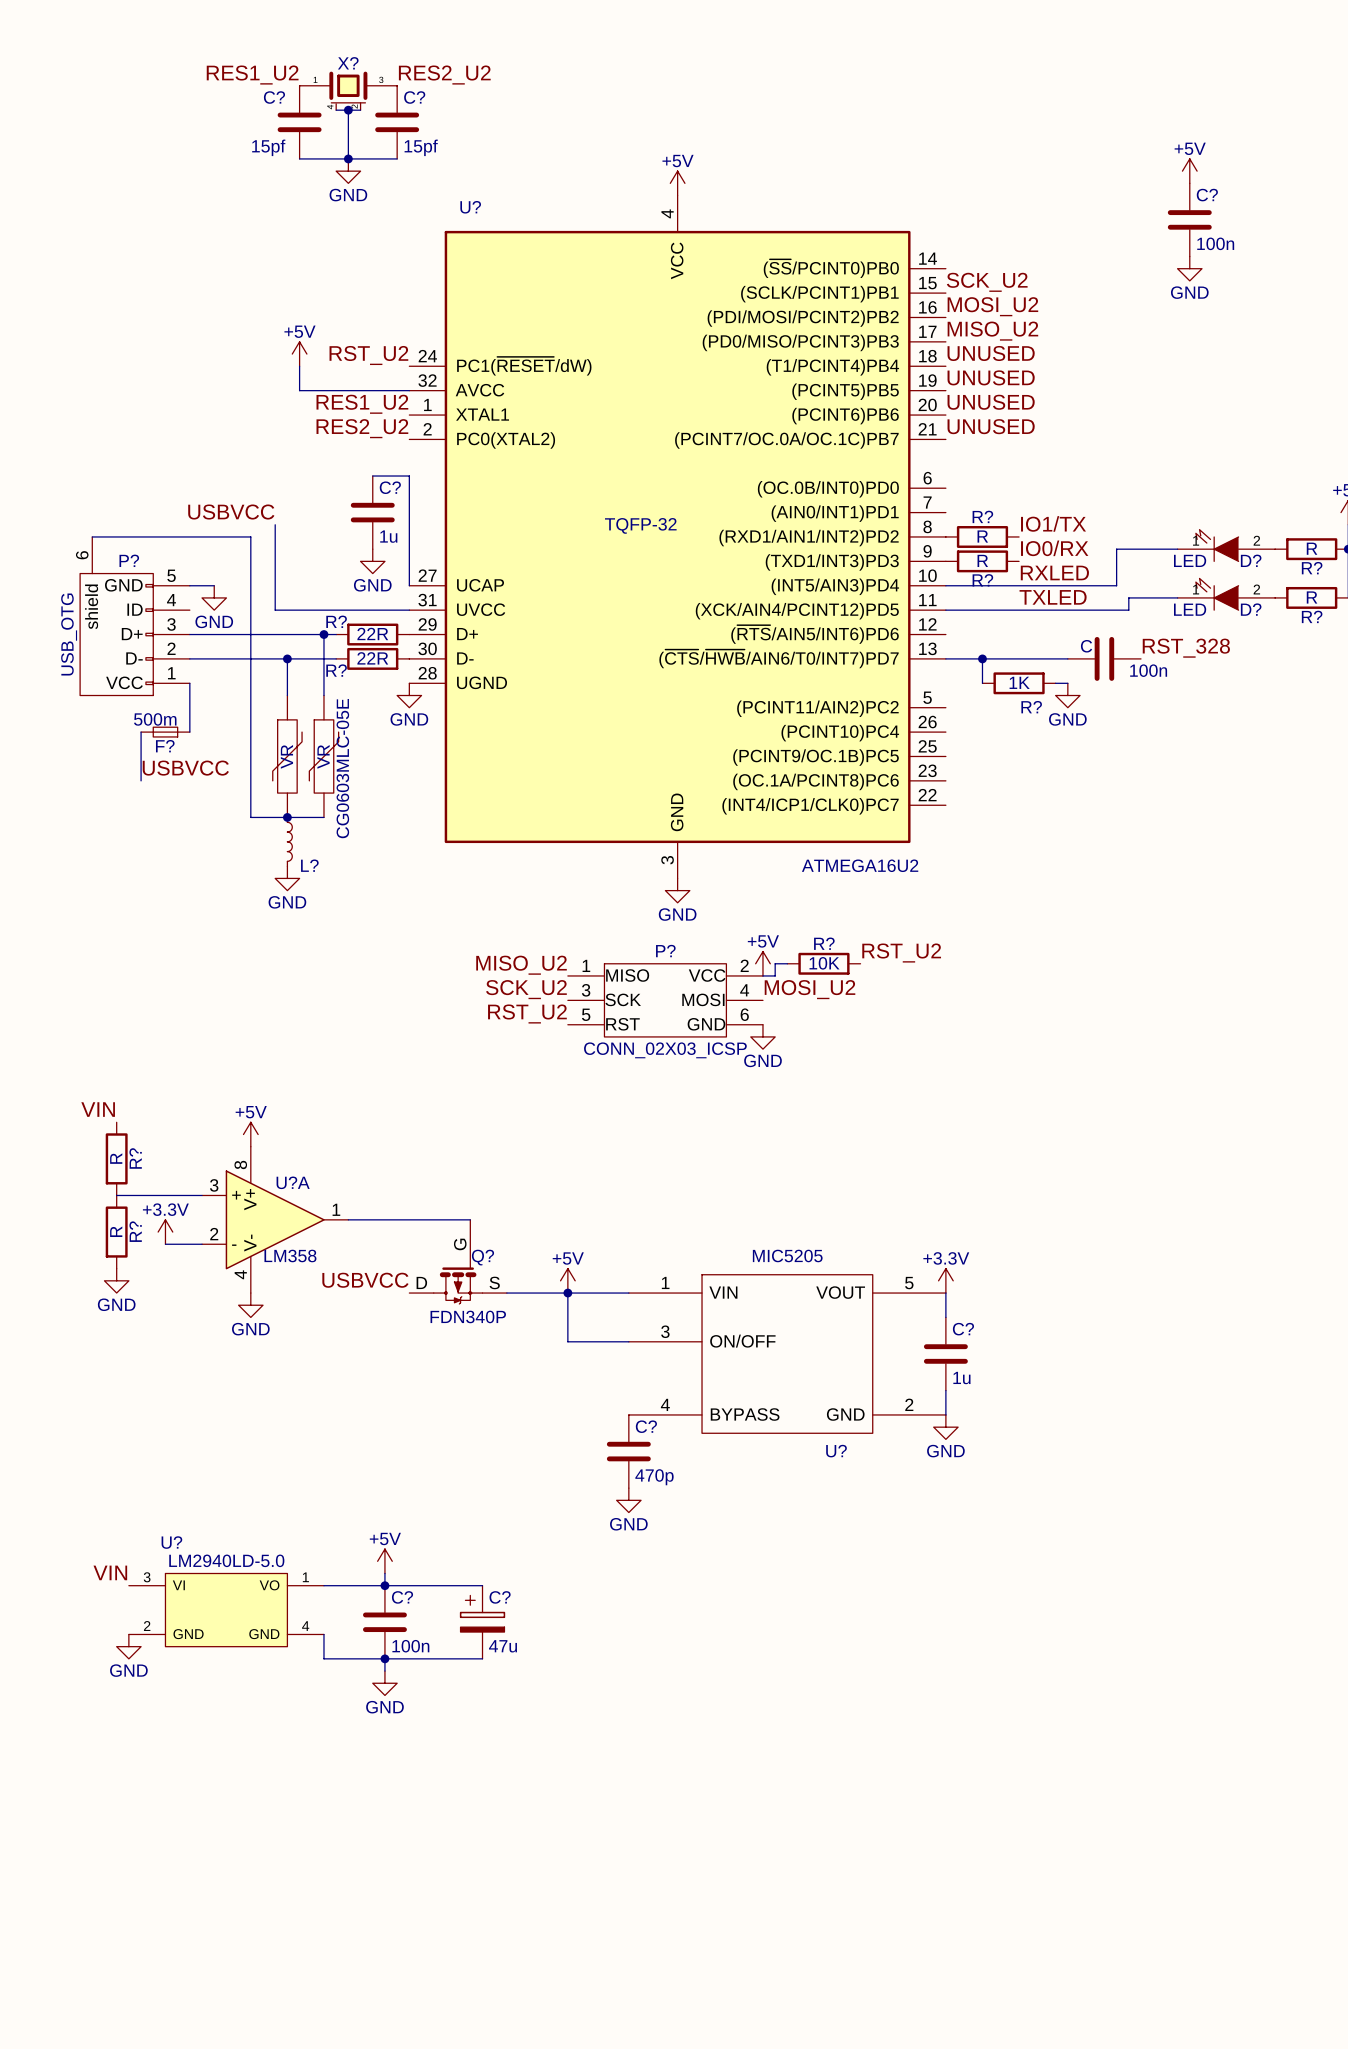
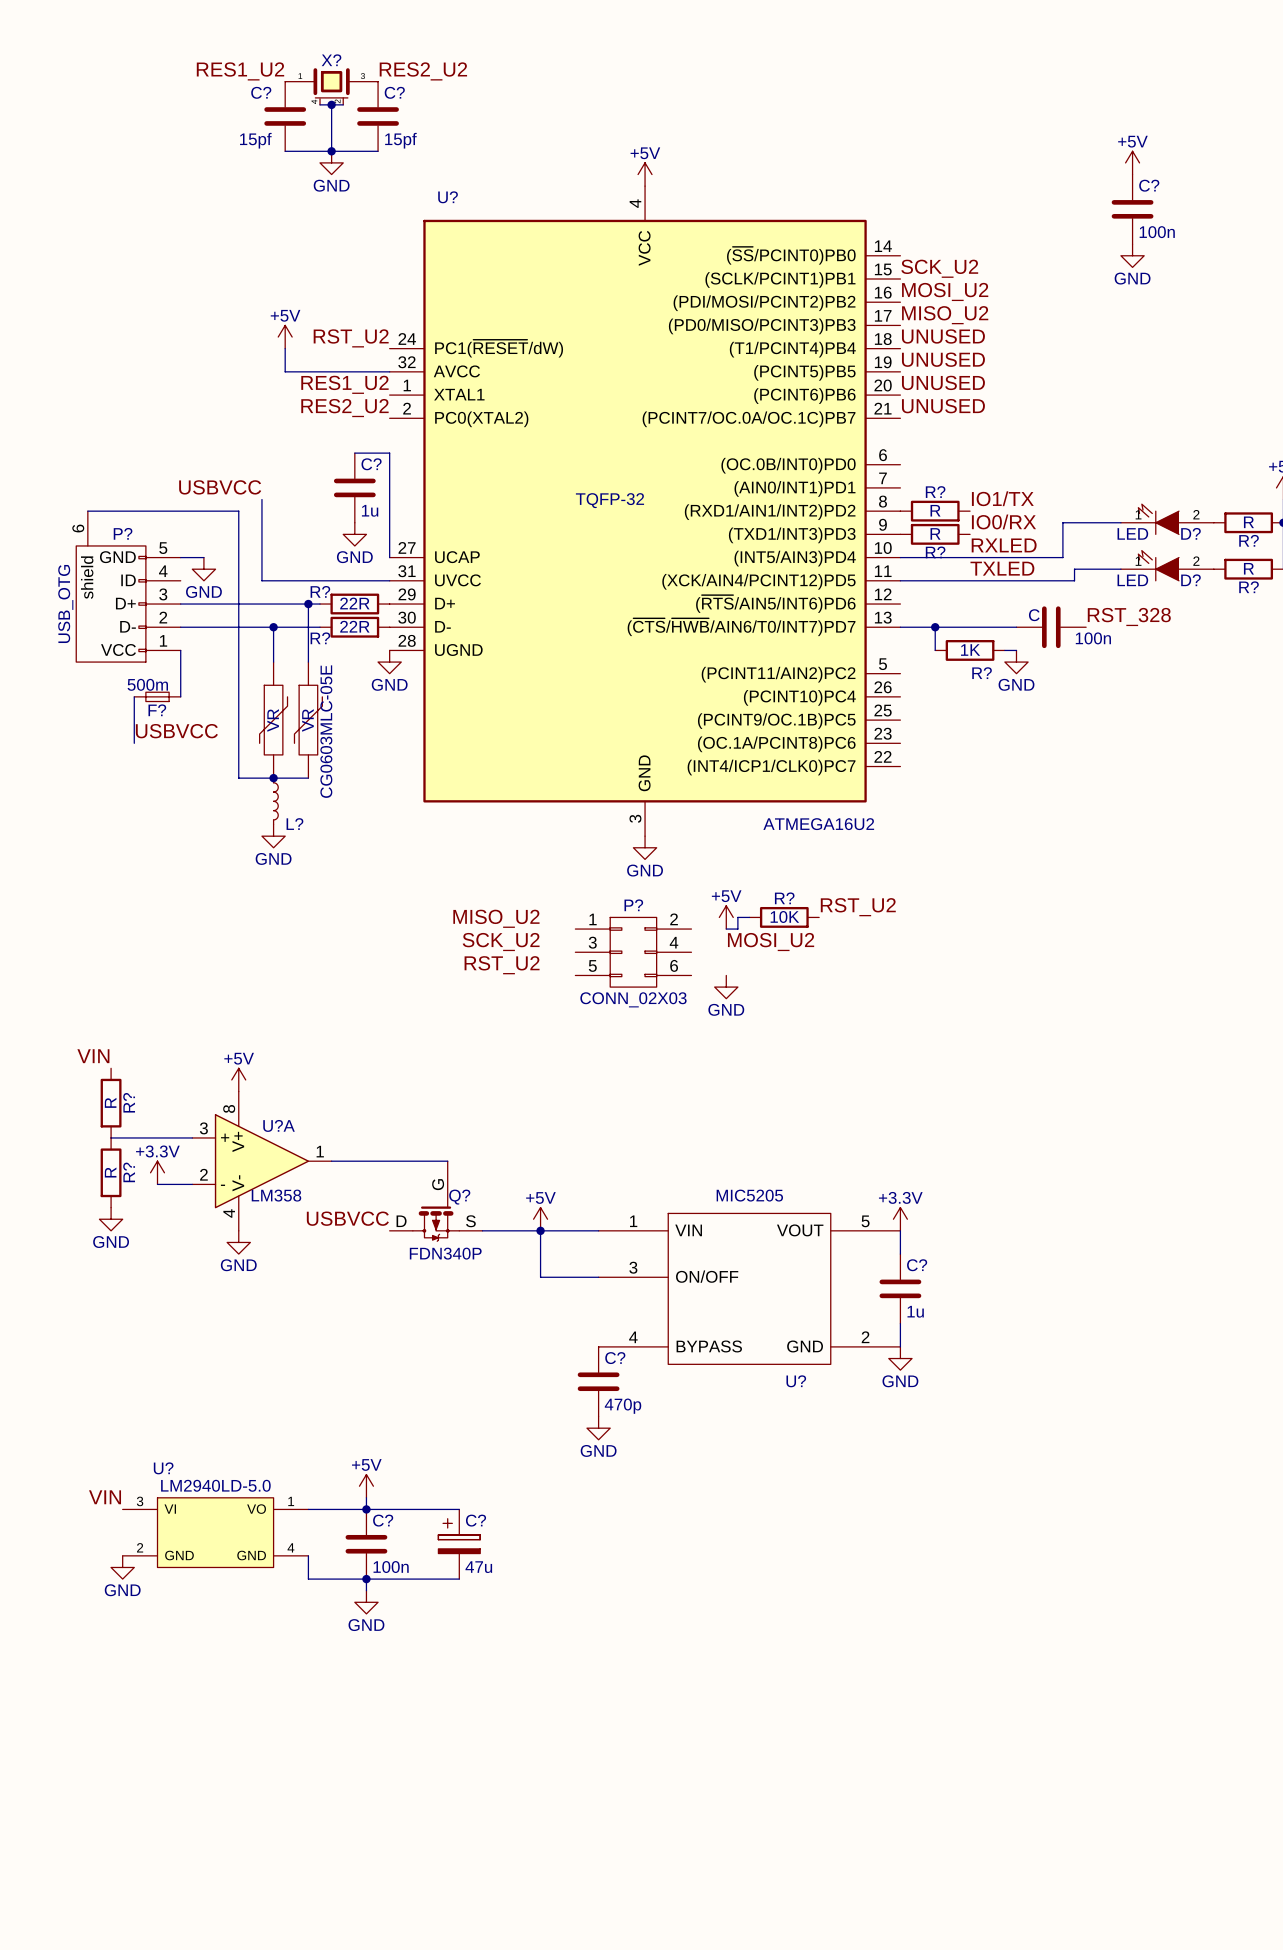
P? symbol: [567, 963, 763, 1037] -> [575, 917, 692, 988]
P? value: CONN_02X03_ICSP (665, 1050) -> CONN_02X03 (633, 999)

